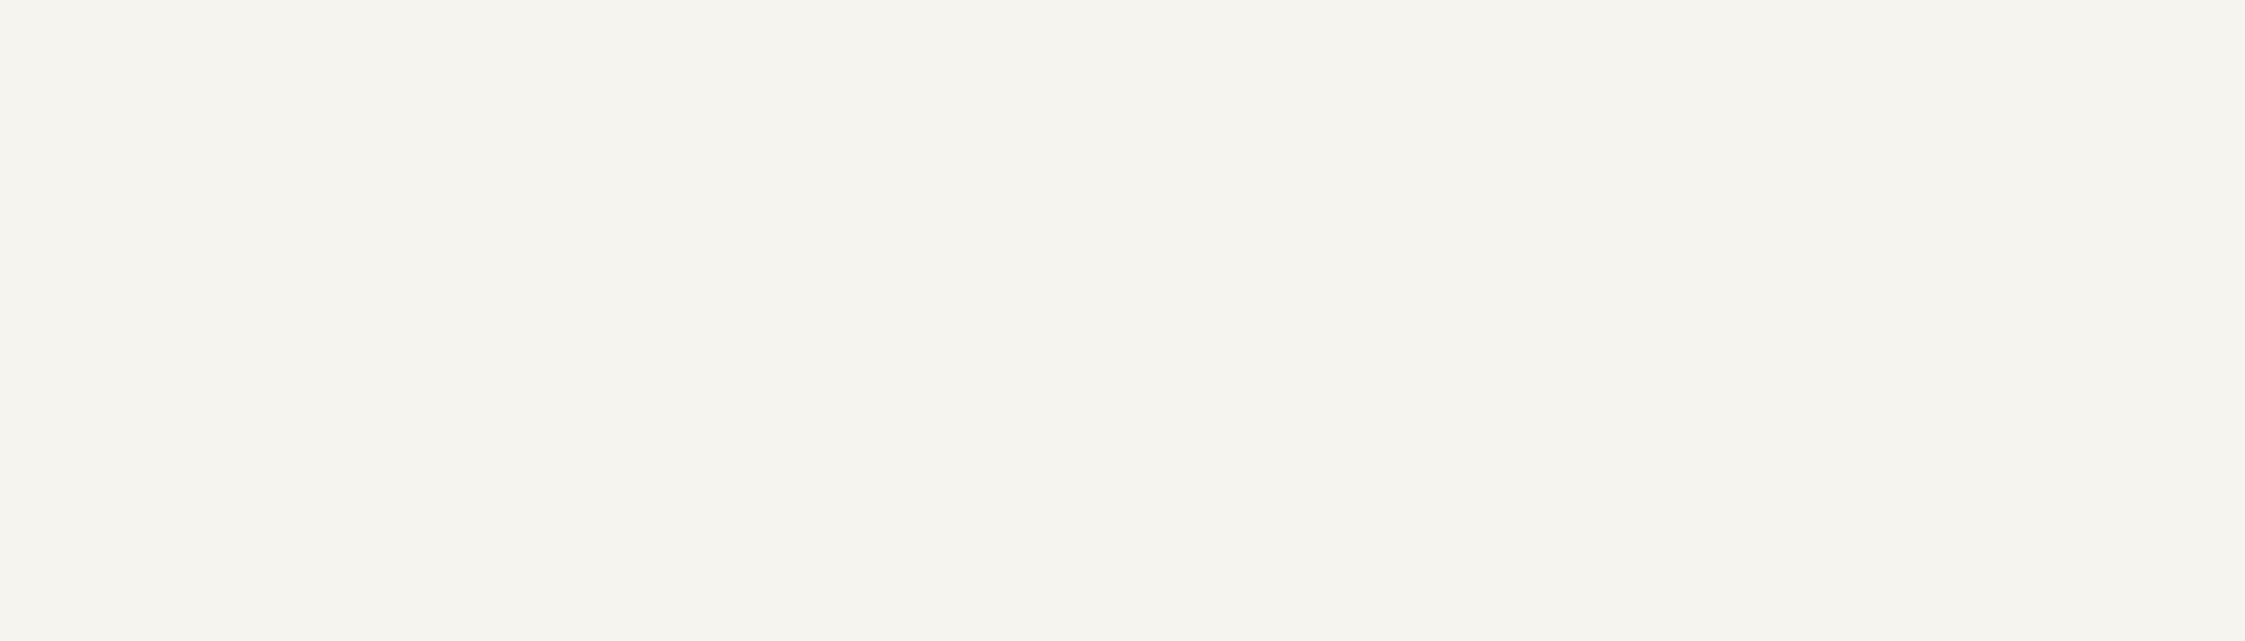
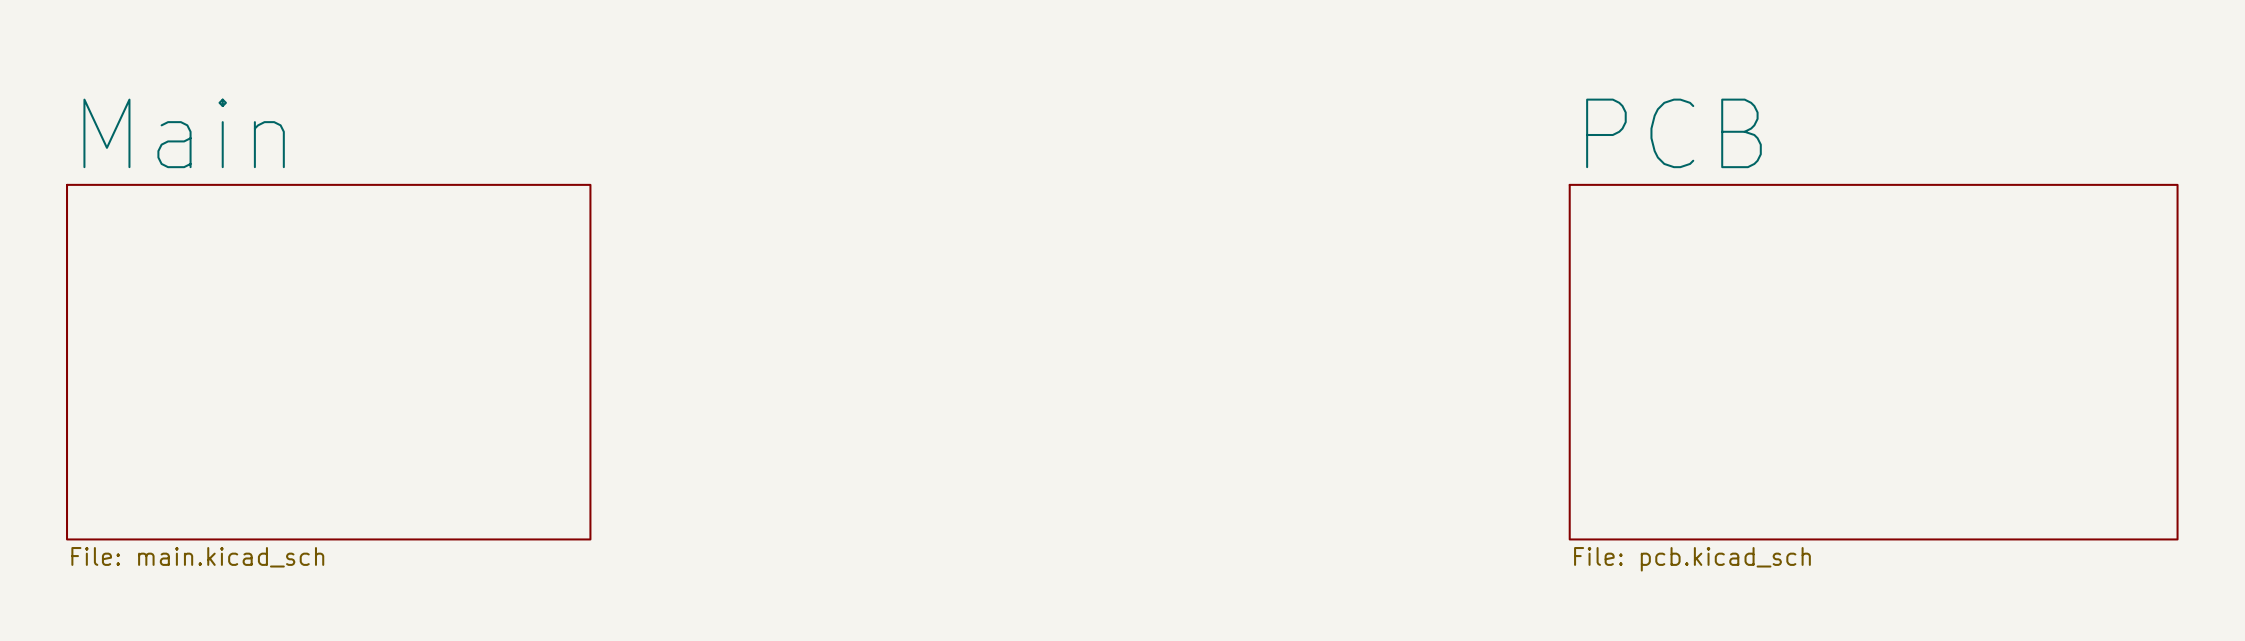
sheet Main: none -> File: main.kicad_sch (328, 362)
sheet PCB: none -> File: pcb.kicad_sch (1873, 362)

